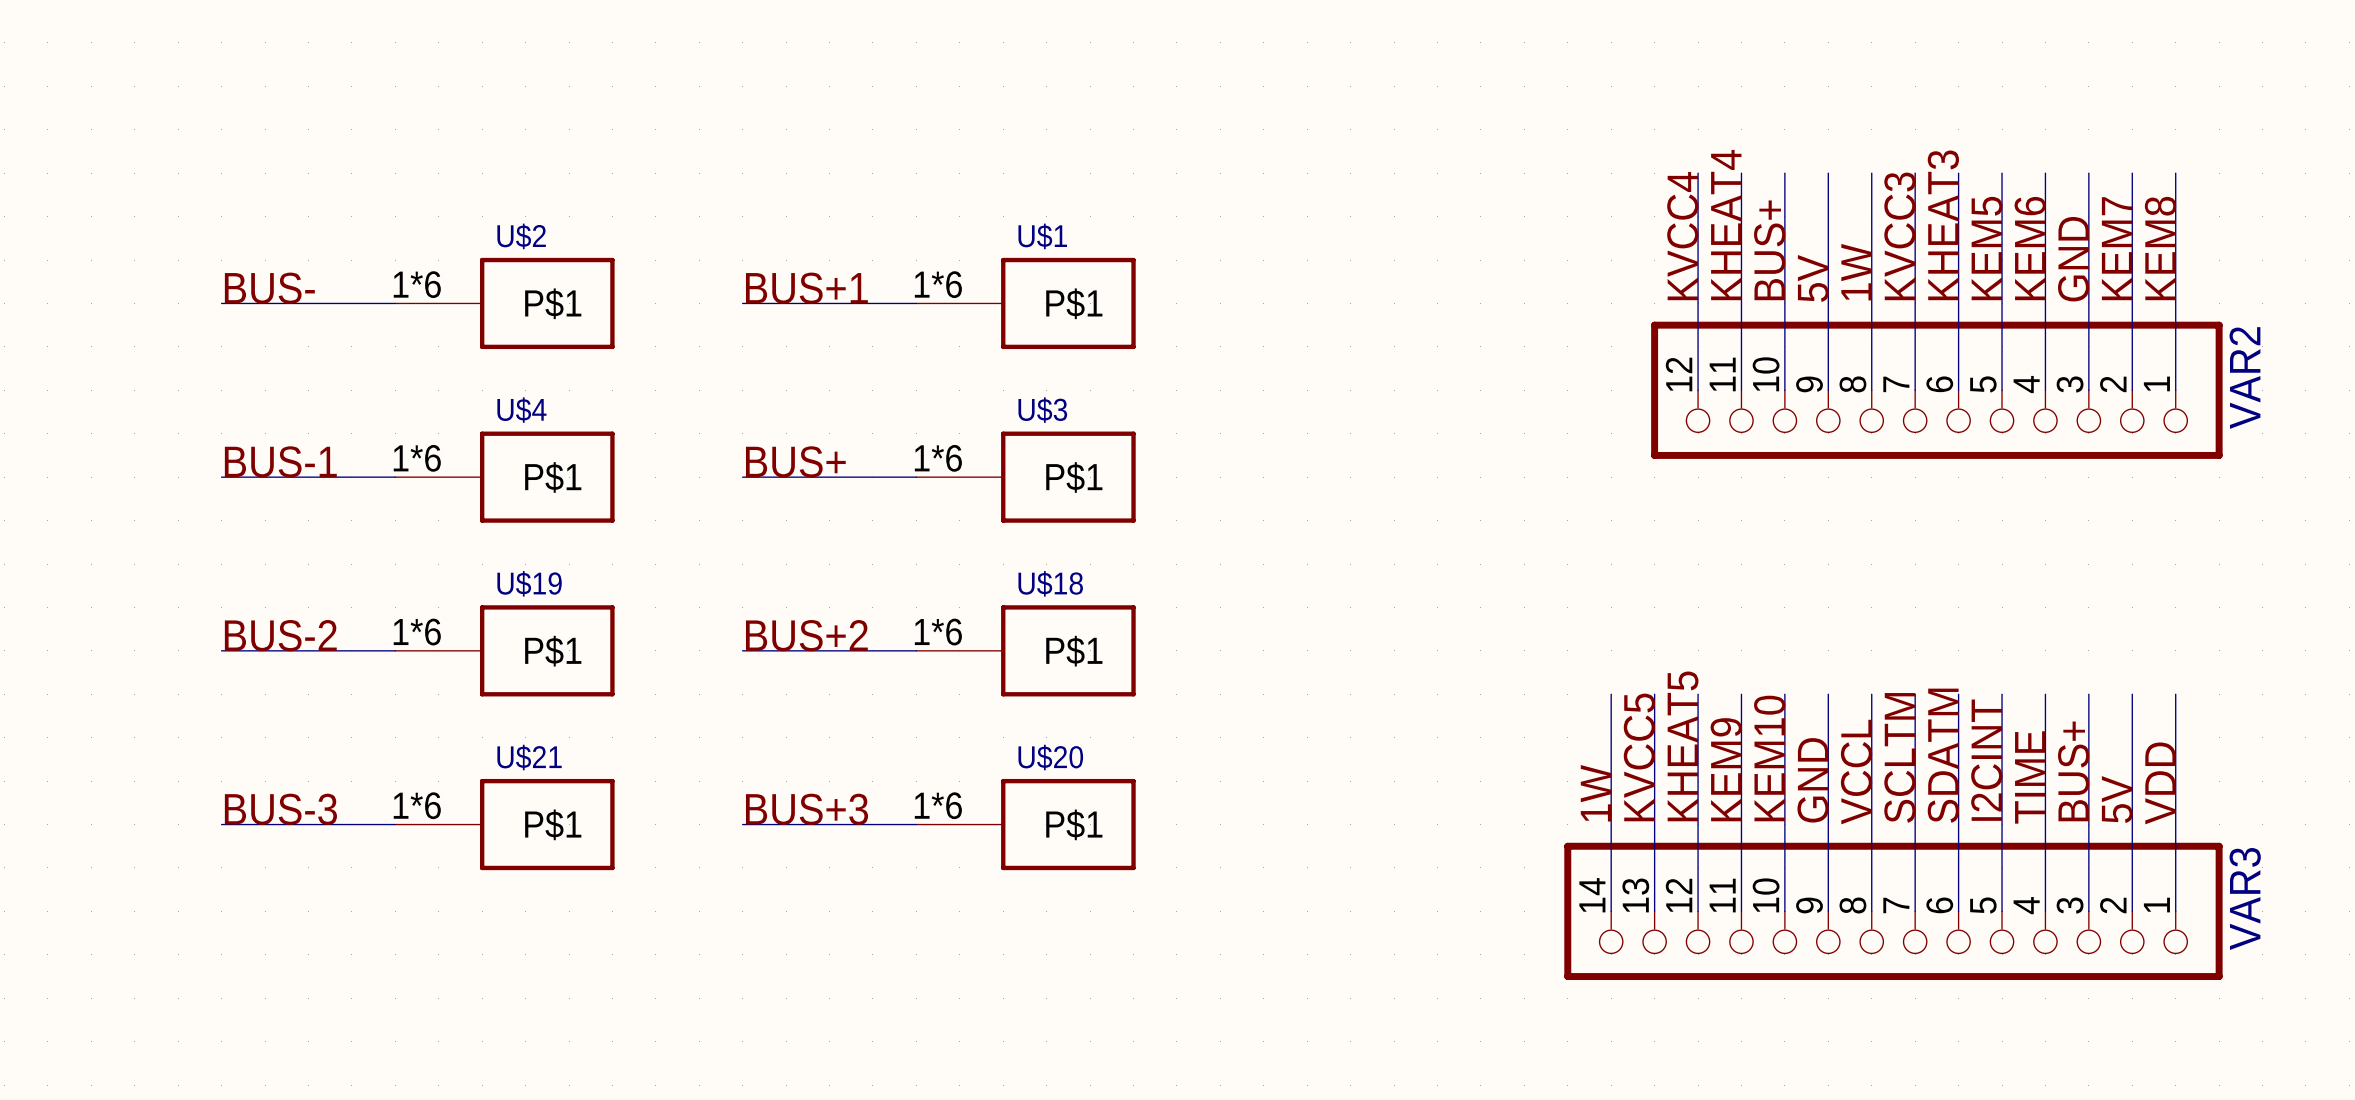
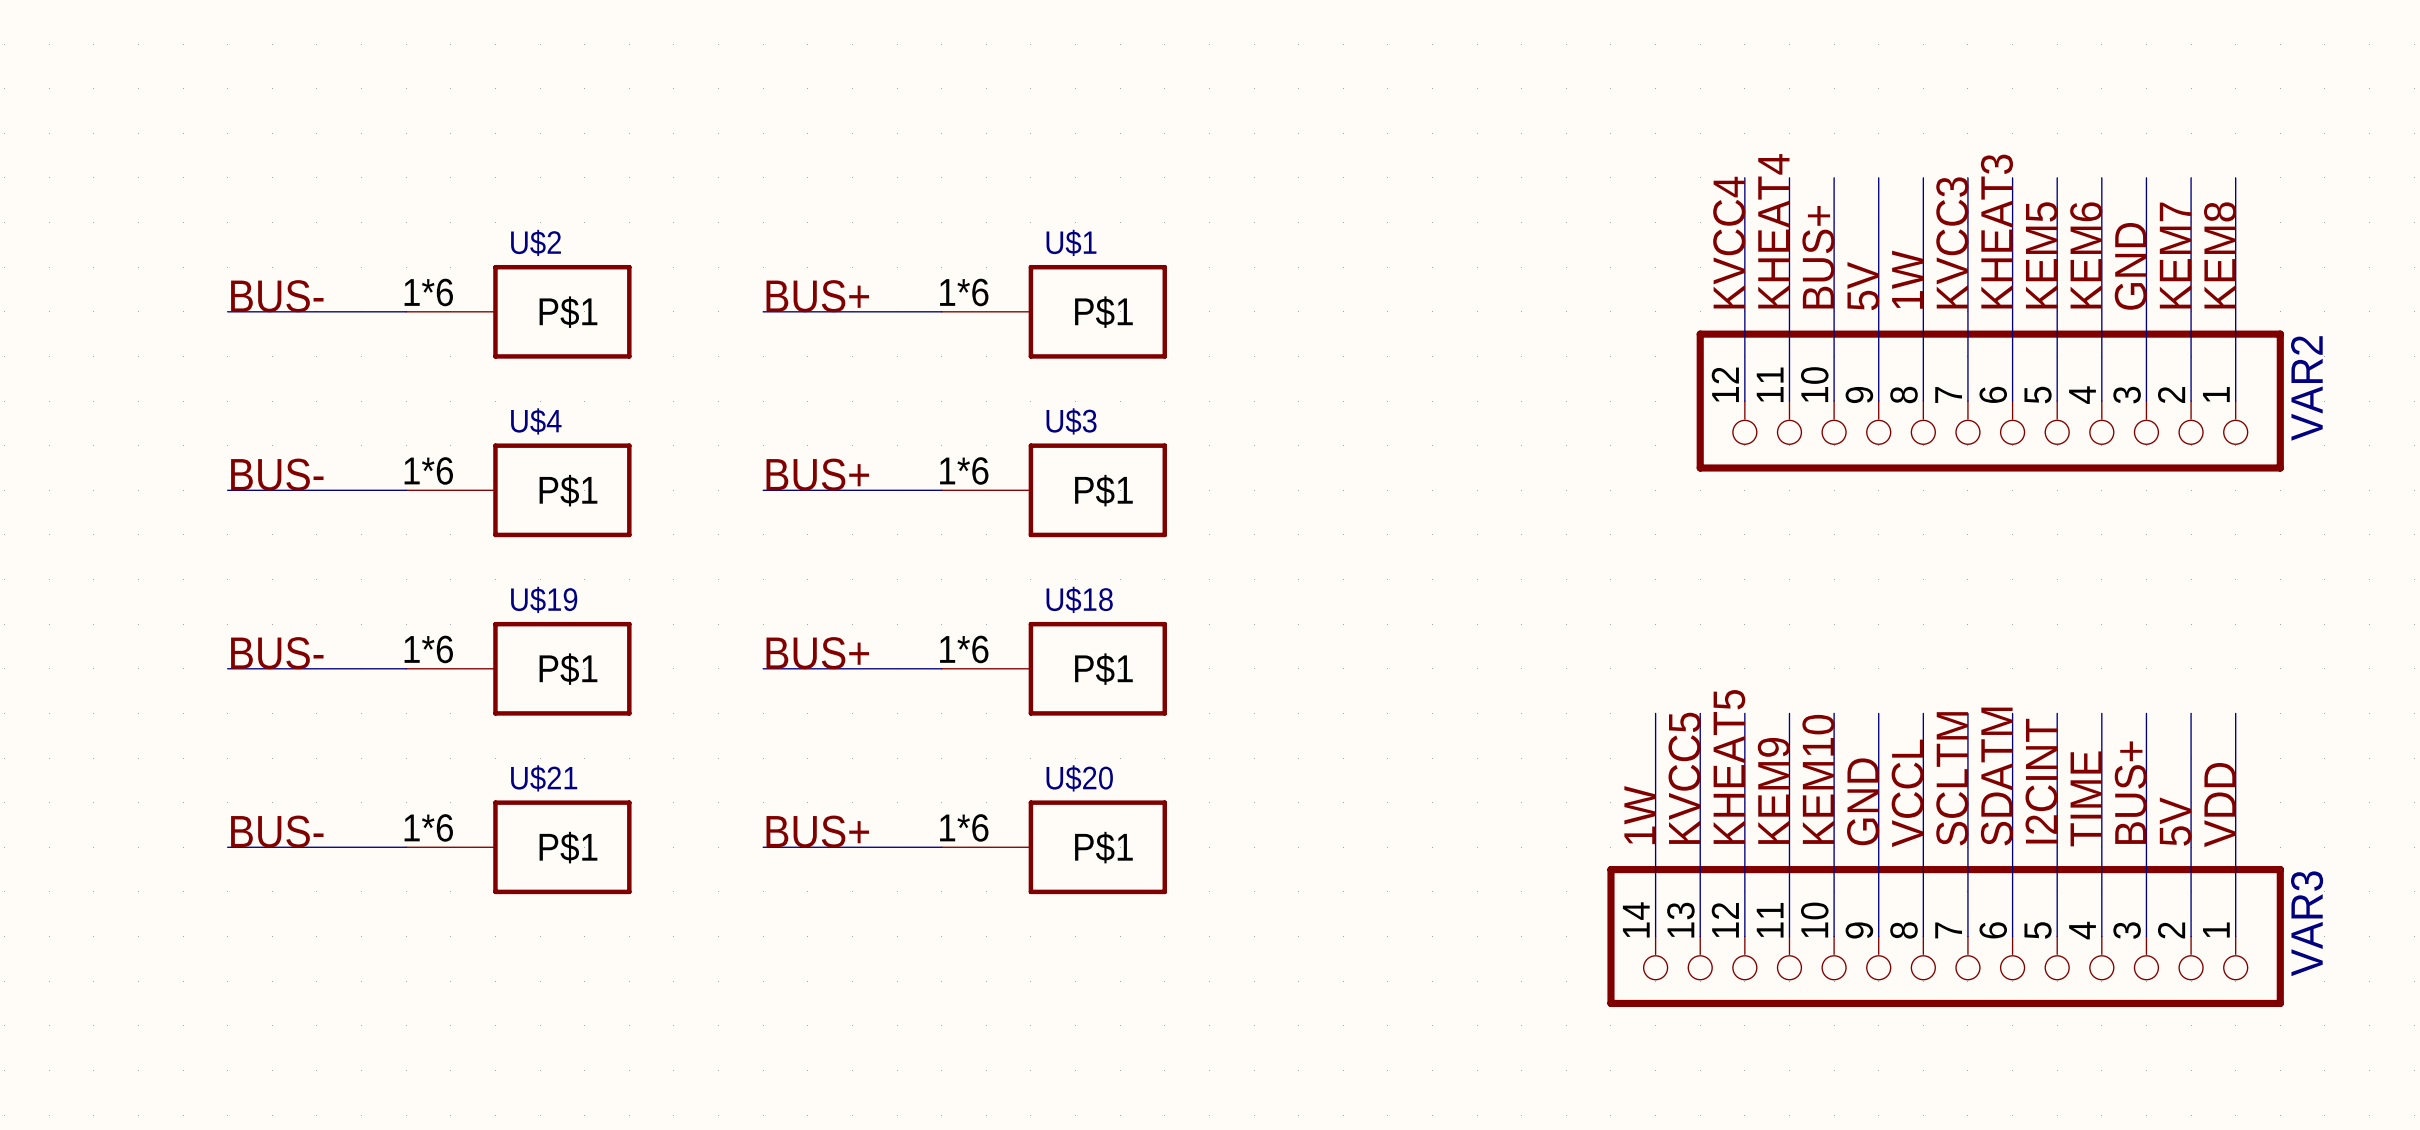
label: BUS+1 (806, 288) -> BUS+ (817, 296)
label: BUS-1 (280, 461) -> BUS- (277, 474)
label: BUS-2 (280, 635) -> BUS- (277, 653)
label: BUS+2 (806, 635) -> BUS+ (817, 653)
label: BUS-3 (280, 809) -> BUS- (277, 831)
label: BUS+3 (807, 809) -> BUS+ (817, 831)

